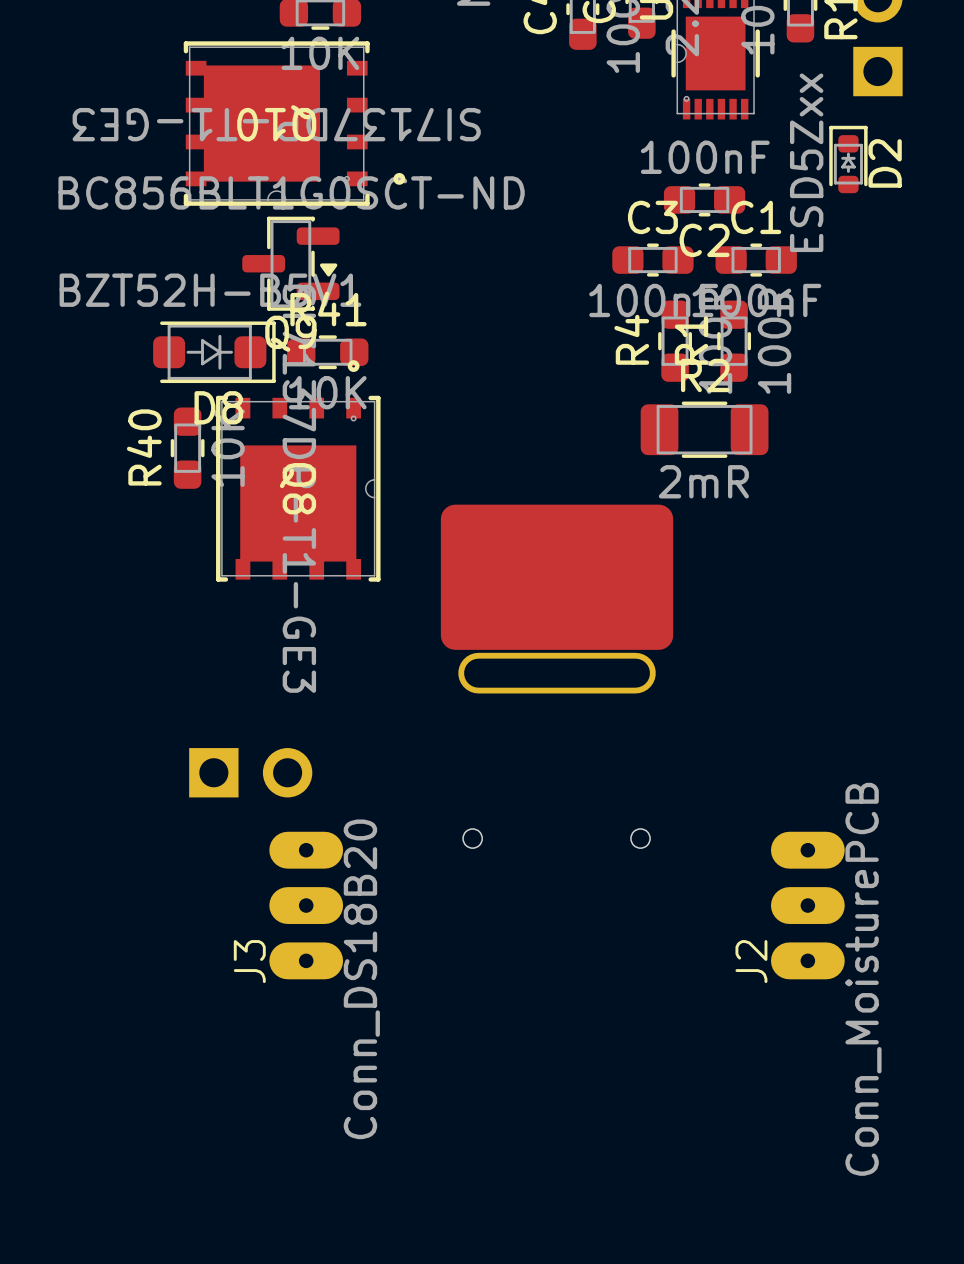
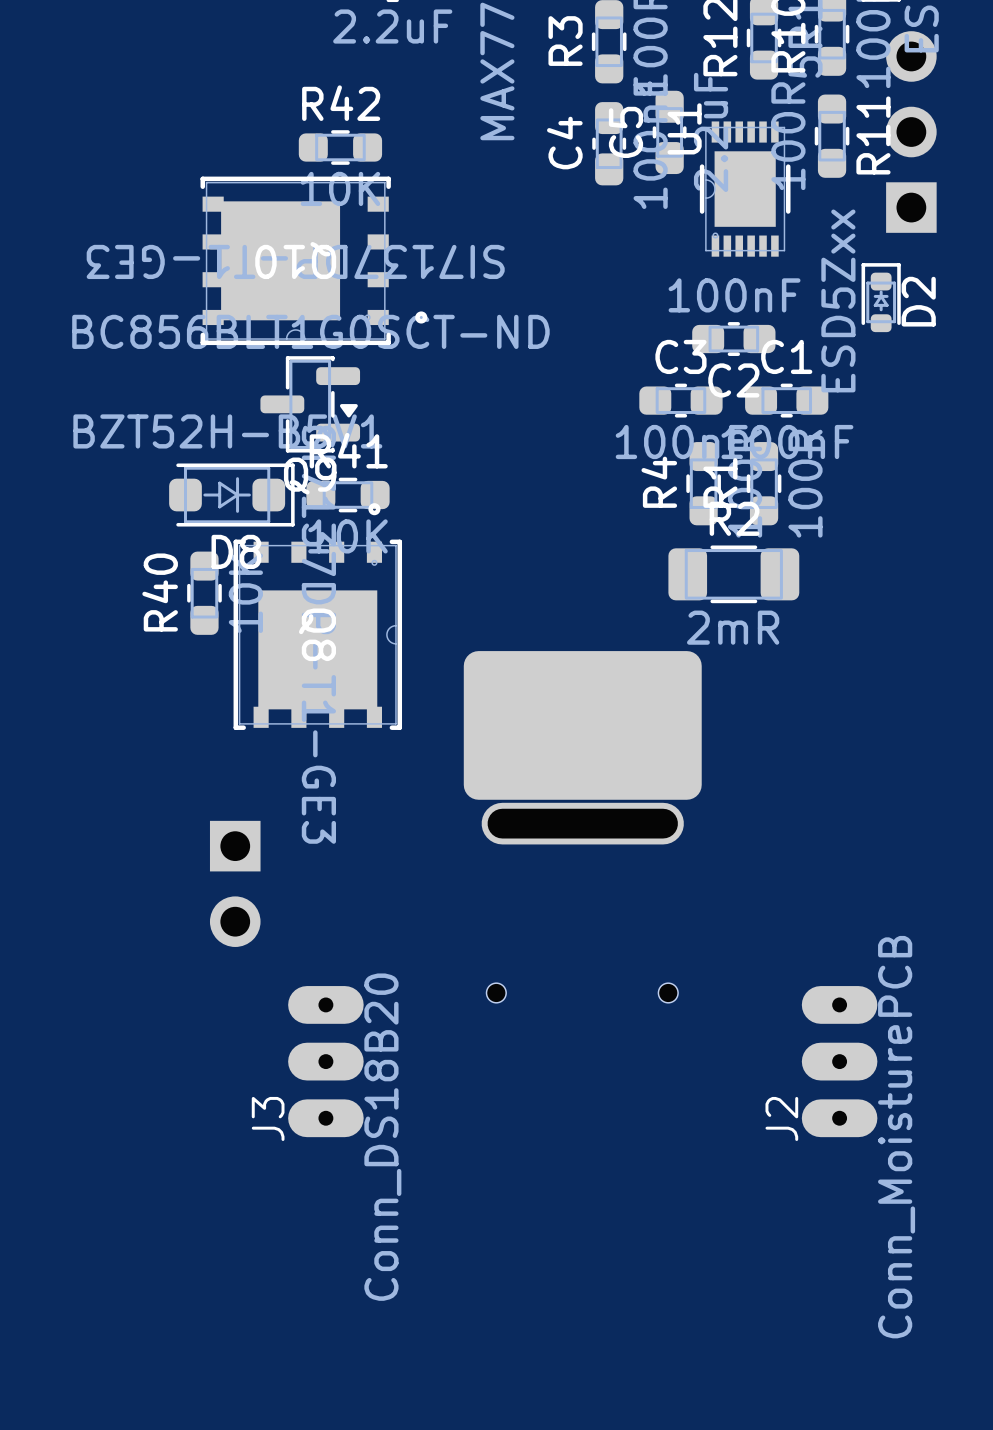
part rotation: 0° (250, 772) -> 90° clockwise (235, 883)

